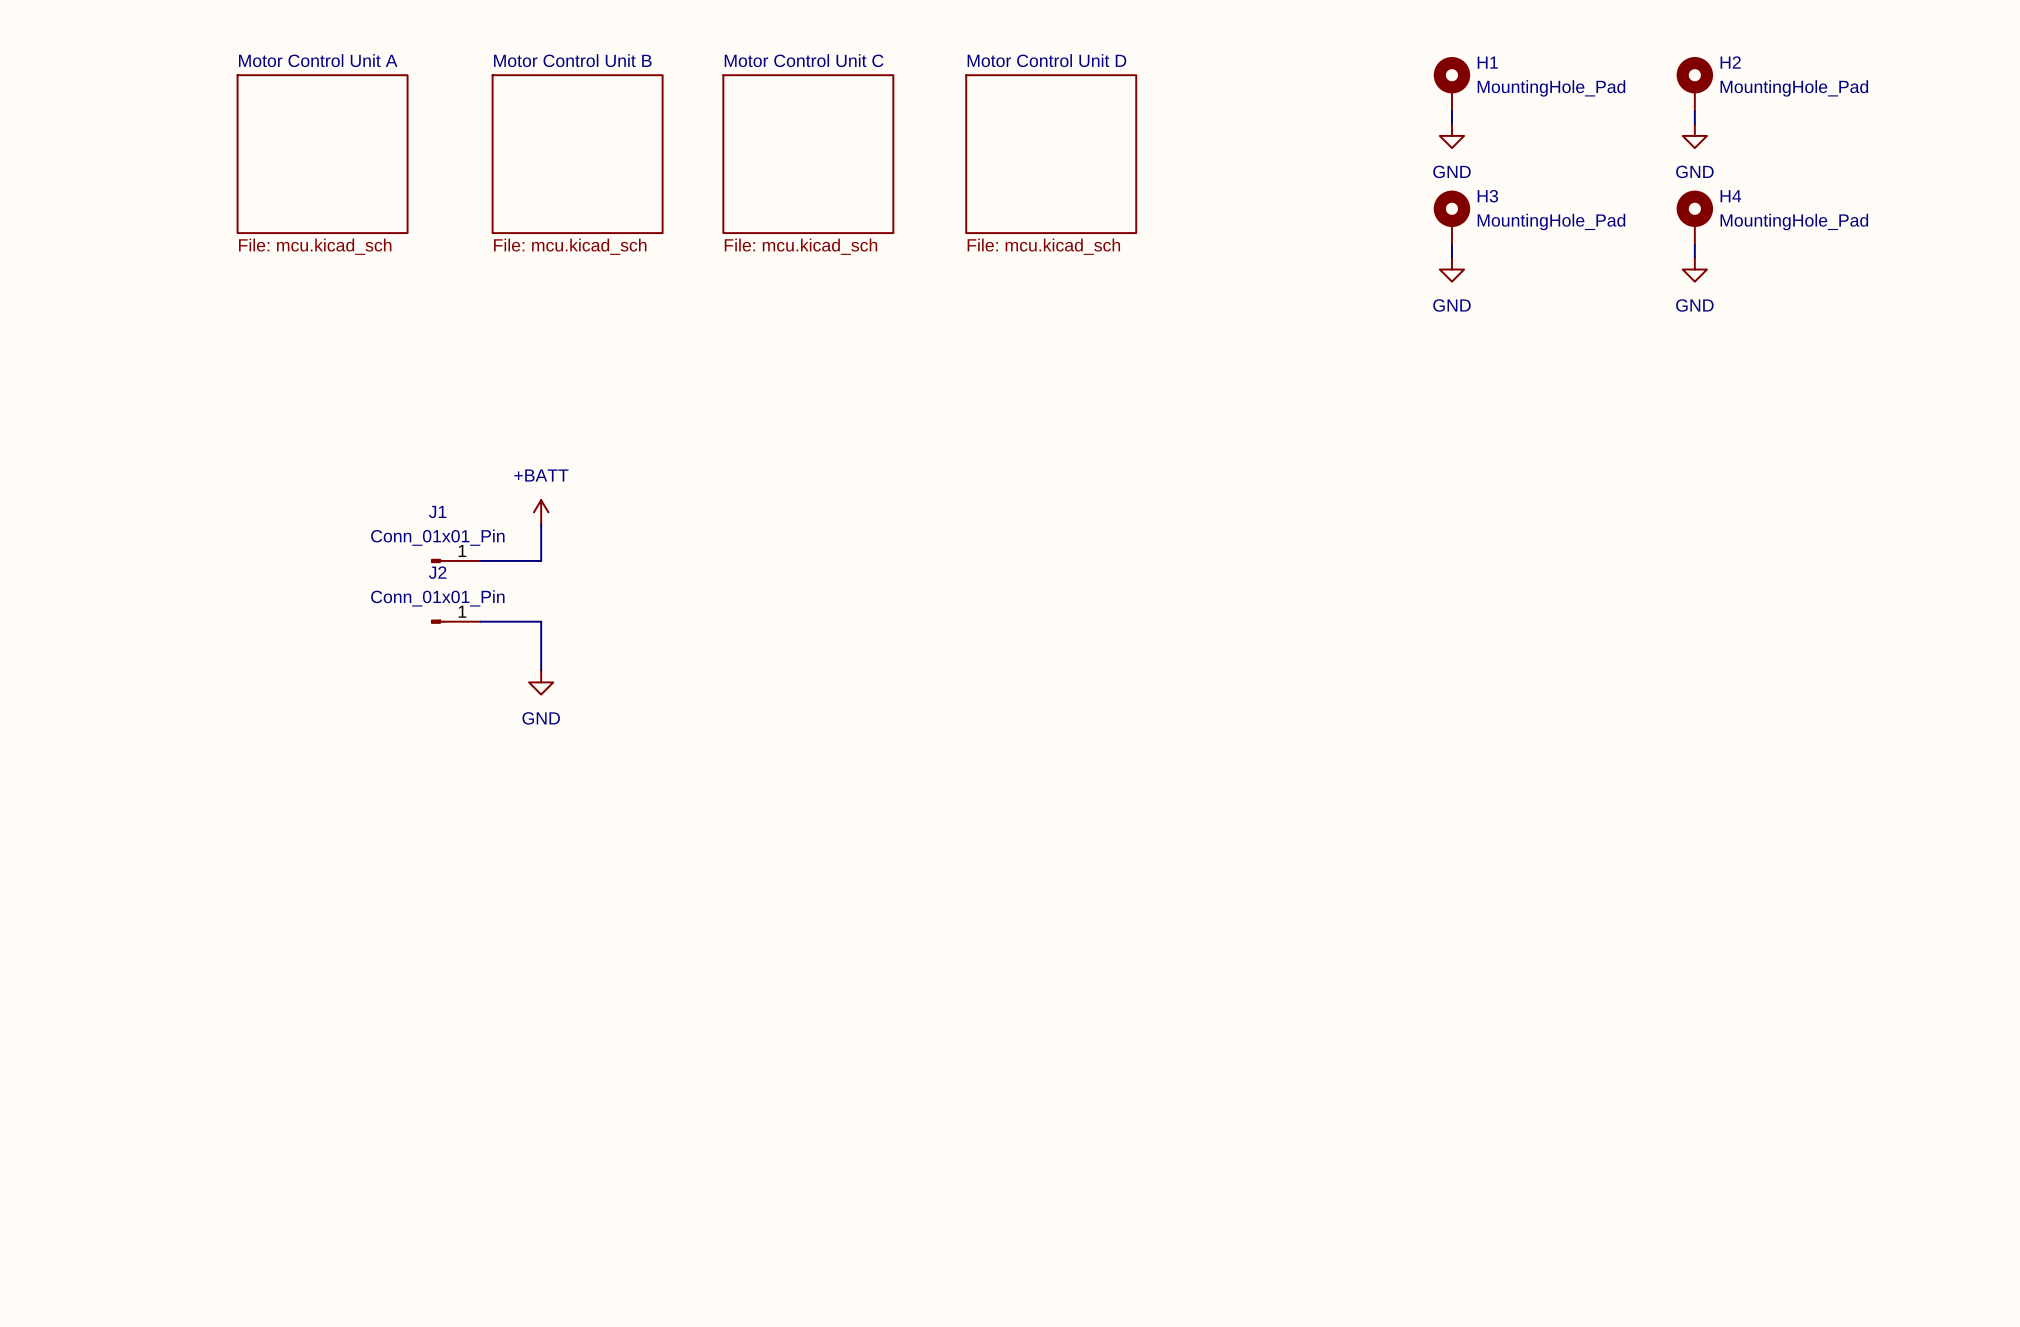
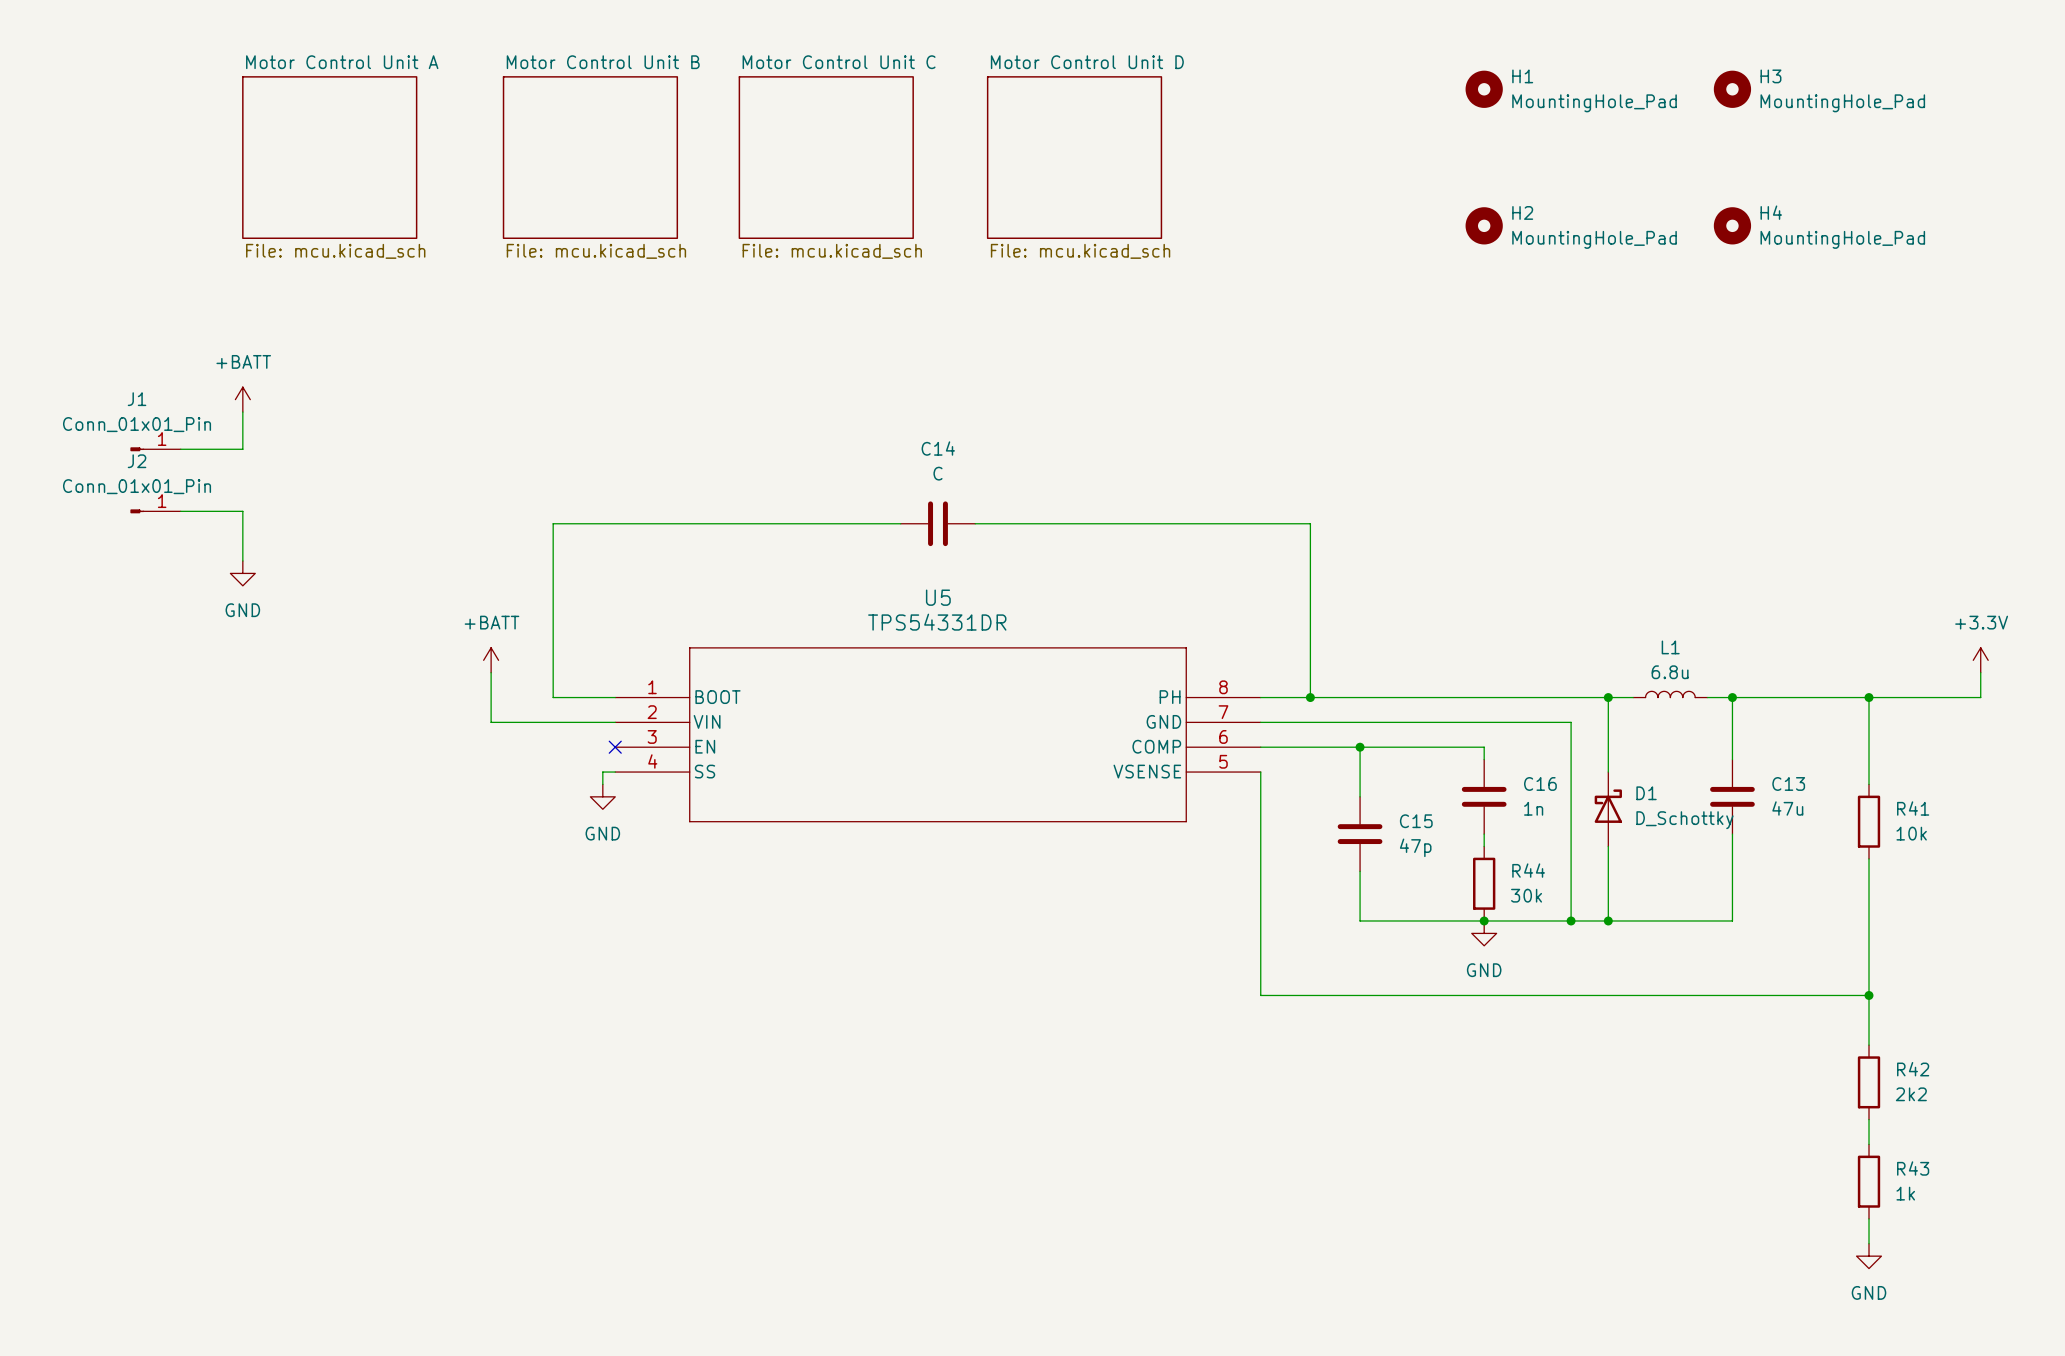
H1 symbol: [1433, 56, 1471, 112] -> [1465, 70, 1503, 108]
H2 symbol: [1676, 56, 1714, 112] -> [1465, 207, 1503, 245]
wire: (1451, 111) (1451, 123) -> none
wire: (1694, 111) (1694, 123) -> none
power symbol: GND (1451, 135) -> none
power symbol: GND (1694, 135) -> none
H3 symbol: [1433, 190, 1471, 246] -> [1713, 70, 1752, 108]
H4 symbol: [1676, 190, 1714, 246] -> [1713, 207, 1752, 245]
wire: (1451, 245) (1451, 257) -> none
wire: (1694, 245) (1694, 257) -> none
power symbol: GND (1451, 269) -> none
power symbol: GND (1694, 269) -> none
power symbol: none -> +BATT (242, 399)
wire: none -> (242, 412) (242, 449) (180, 449)
wire: none -> (180, 511) (242, 511) (242, 561)
power symbol position: +BATT (541, 512) -> +BATT (491, 660)
wire: none -> (900, 523) (553, 523) (553, 536)
C14: none -> C (937, 523)
wire: none -> (975, 523) (1310, 523) (1310, 697)
power symbol: none -> GND (242, 573)
J1 position: (455, 560) -> (155, 449)
wire: (480, 560) (541, 560) -> (553, 635) (553, 573)
J2 position: (455, 621) -> (155, 511)
wire: (480, 621) (541, 621) -> none
power symbol: none -> +3.3V (1980, 660)
wire: none -> (491, 672) (491, 722) (615, 722)
wire: none -> (1980, 672) (1980, 697) (1707, 697)
wire: none -> (553, 685) (553, 697) (615, 697)
L1: none -> 6.8u (1670, 694)
power symbol position: GND (541, 682) -> GND (602, 796)
wire: none -> (1260, 697) (1633, 697)
junction: none -> (1310, 697)
wire: none -> (1608, 697) (1608, 772)
junction: none -> (1608, 697)
wire: none -> (1732, 697) (1732, 759)
junction: none -> (1732, 697)
wire: none -> (1869, 697) (1869, 784)
junction: none -> (1869, 697)
wire: none -> (1260, 722) (1571, 722) (1571, 920)
U5: none -> TPS54331DR (937, 734)
no-connect mark: none -> (615, 747)
wire: none -> (1260, 747) (1484, 747) (1484, 759)
wire: none -> (1360, 747) (1360, 796)
junction: none -> (1360, 747)
wire: none -> (615, 772) (602, 772) (602, 784)
wire: none -> (1260, 772) (1260, 995) (1869, 995)
C16: none -> 1n (1484, 796)
C13: none -> 47u (1732, 796)
D1: none -> D_Schottky (1608, 809)
R41: none -> 10k (1869, 821)
C15: none -> 47p (1360, 834)
wire: none -> (1484, 834) (1484, 846)
wire: none -> (1732, 834) (1732, 920) (1360, 920) (1360, 871)
wire: none -> (1608, 846) (1608, 920)
wire: none -> (1869, 858) (1869, 1045)
R44: none -> 30k (1484, 883)
junction: none -> (1484, 920)
junction: none -> (1571, 920)
junction: none -> (1608, 920)
power symbol: none -> GND (1484, 933)
junction: none -> (1869, 995)
R42: none -> 2k2 (1869, 1082)
wire: none -> (1869, 1119) (1869, 1144)
R43: none -> 1k (1869, 1181)
wire: none -> (1869, 1218) (1869, 1243)
power symbol: none -> GND (1869, 1256)

